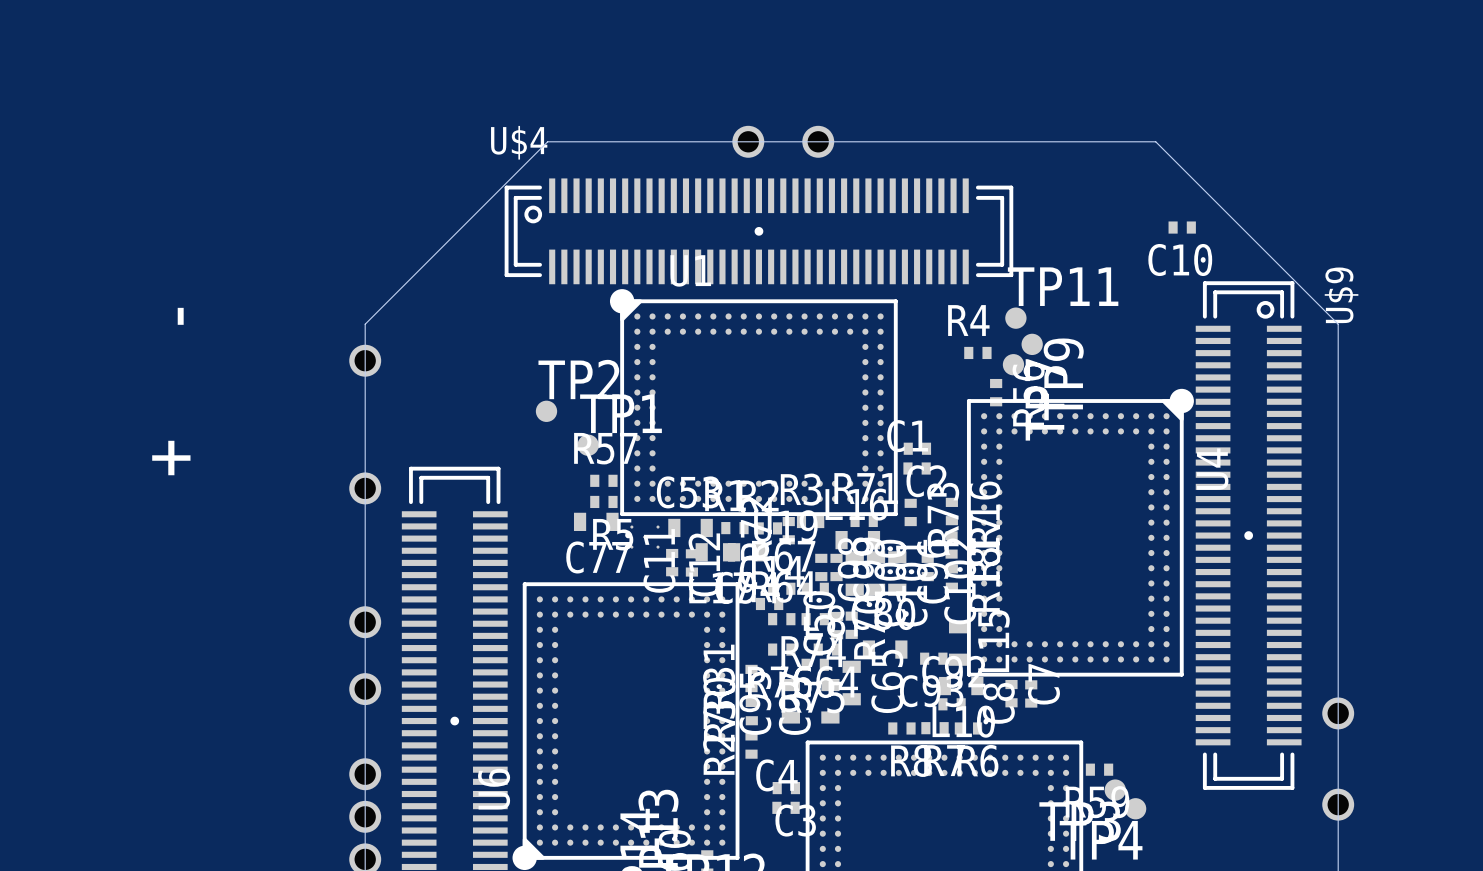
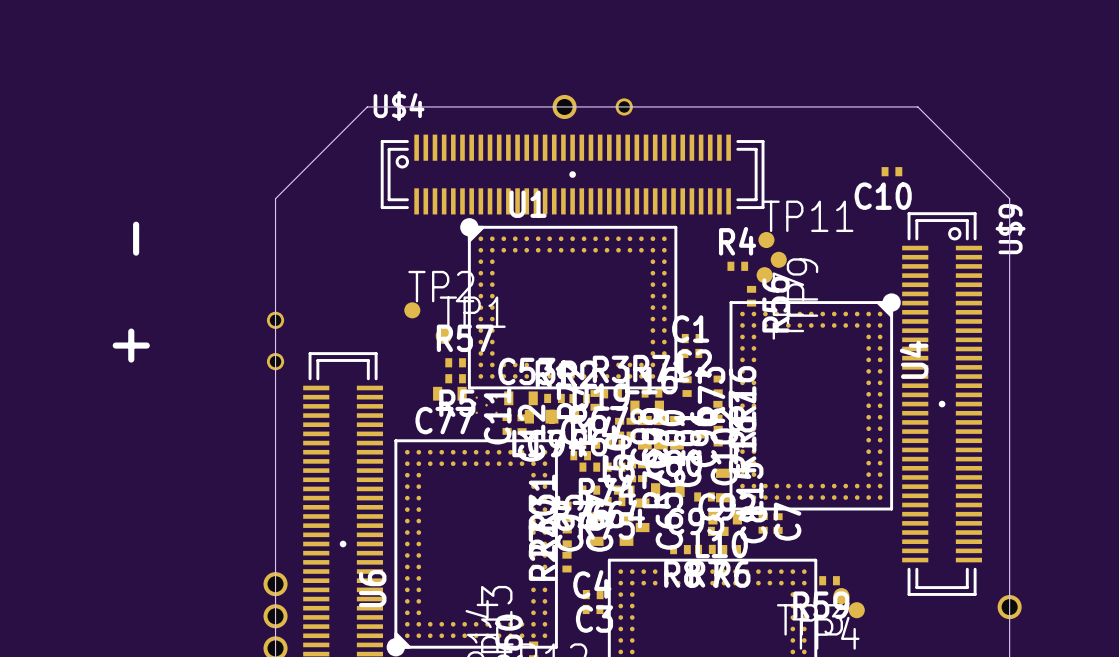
part footprint: [802, 125, 835, 158] -> [615, 98, 633, 116]
board edge: (547, 141) (365, 324) -> (413, 106) (367, 106) (275, 198) (275, 244)
board edge: (1155, 141) (1338, 324) -> (871, 106) (917, 106) (1009, 198) (1009, 244)
part: (365, 360) -> none
part: none -> (275, 320)
part footprint: [349, 472, 382, 505] -> [266, 353, 285, 371]
part: (365, 622) -> none
part: (365, 689) -> none
part: (1338, 713) -> none

